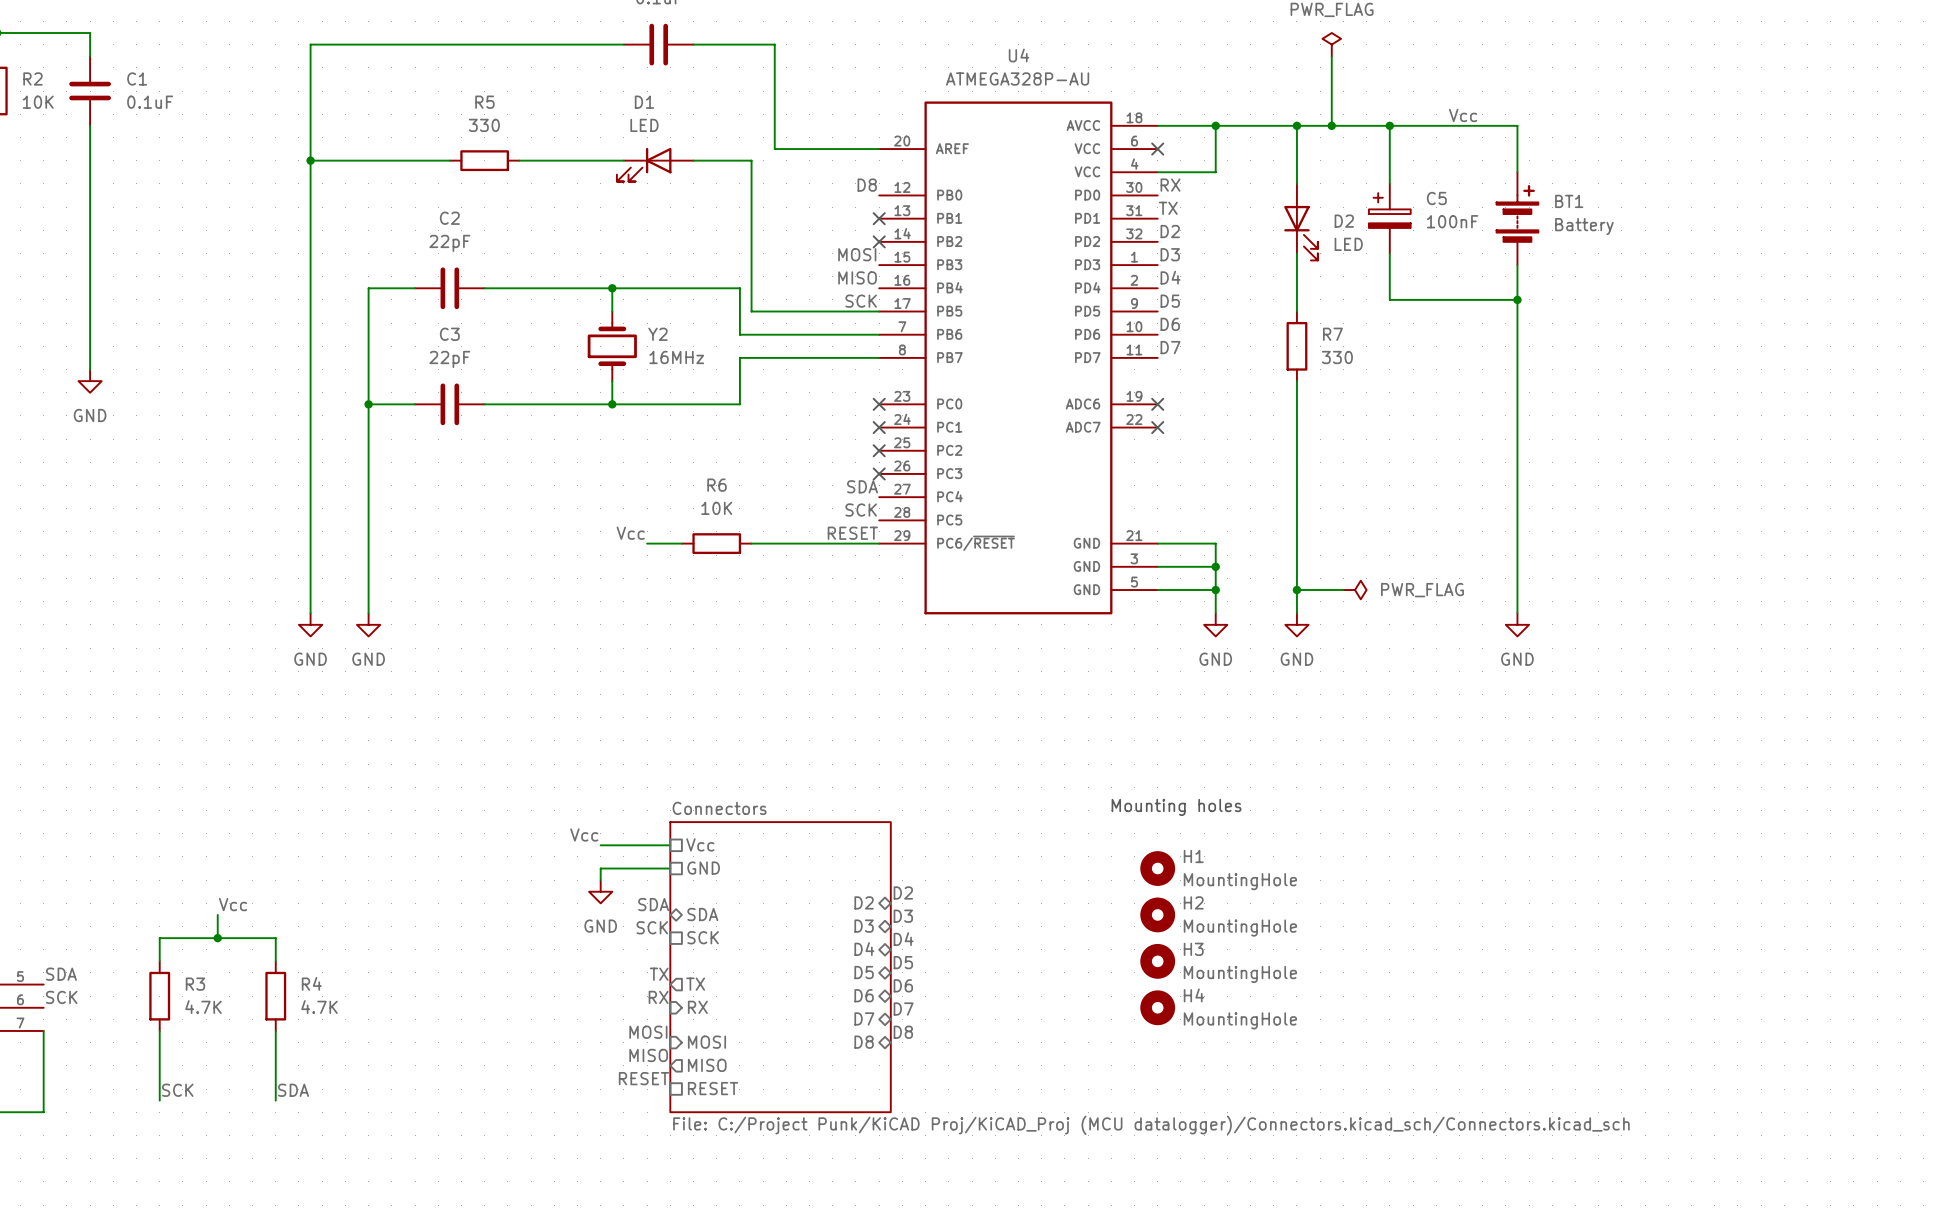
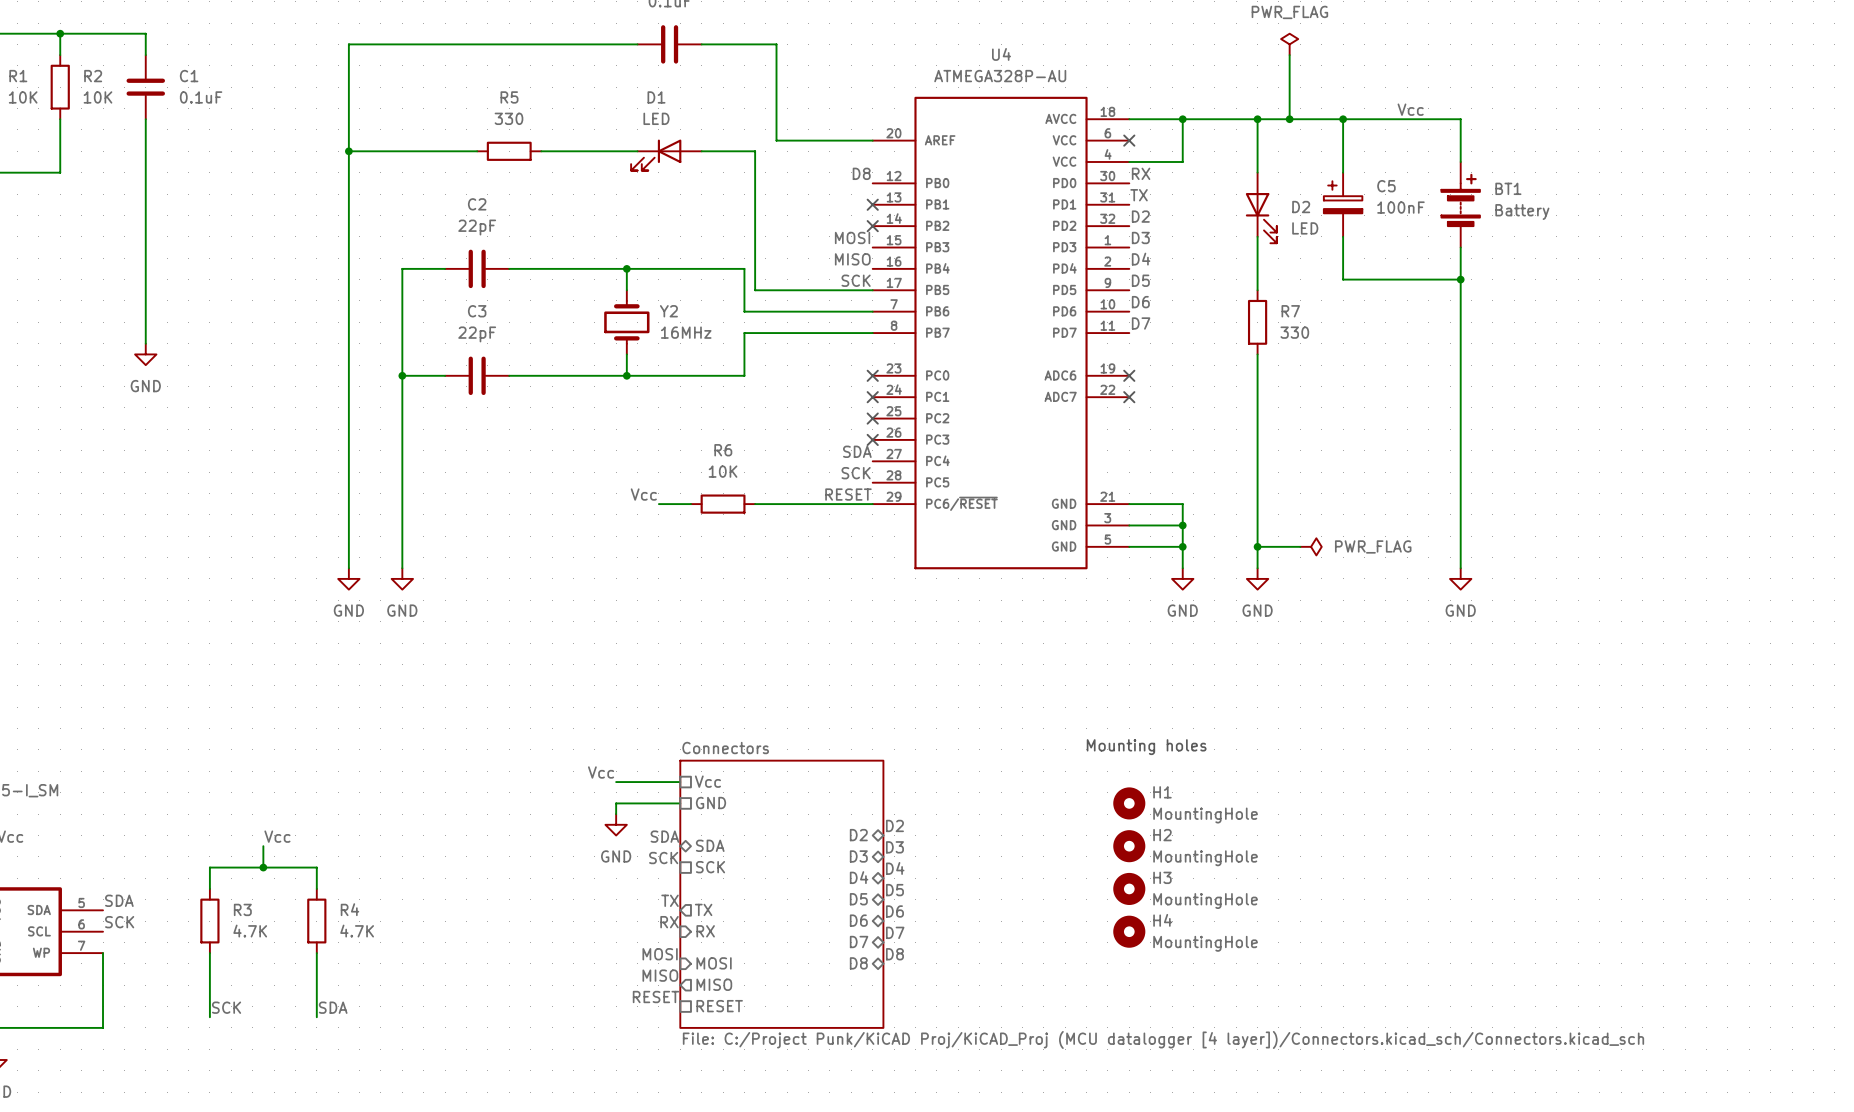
sheet Connectors value: File: C:/Project Punk/KiCAD Proj/KiCAD_Proj (MCU datalogger)/Connectors.kicad_sch/Connectors.kicad_sch (1151, 1125) -> File: C:/Project Punk/KiCAD Proj/KiCAD_Proj (MCU datalogger [4 layer])/Connectors.kicad_sch/Connectors.kicad_sch (1163, 1039)

